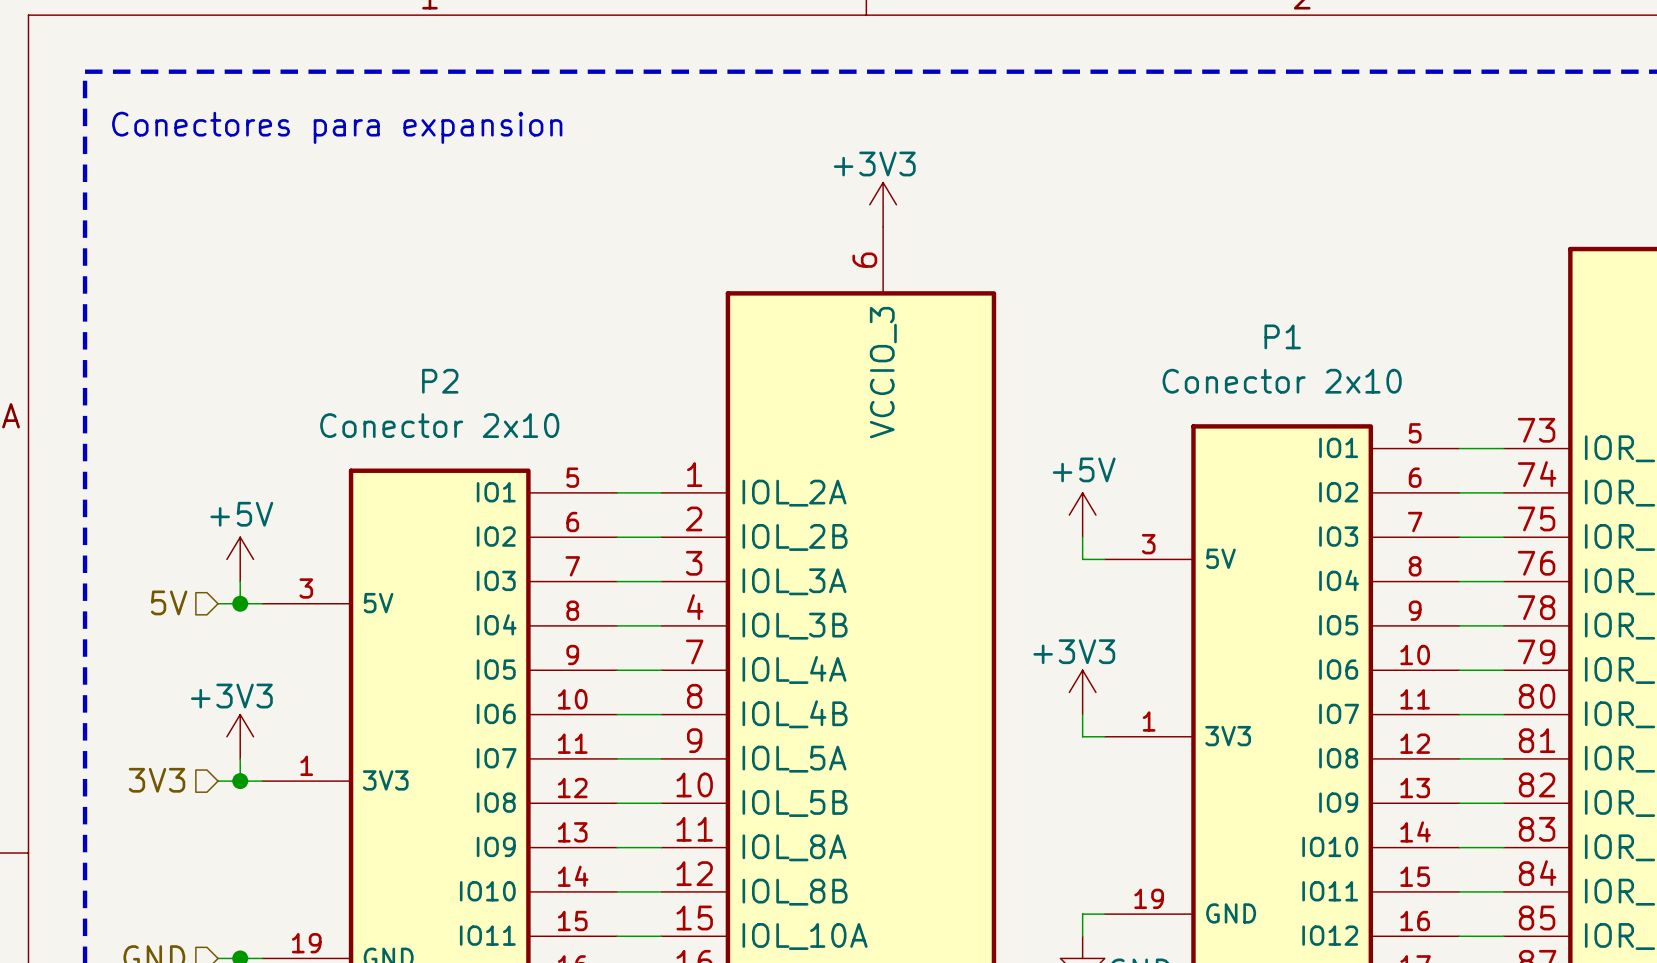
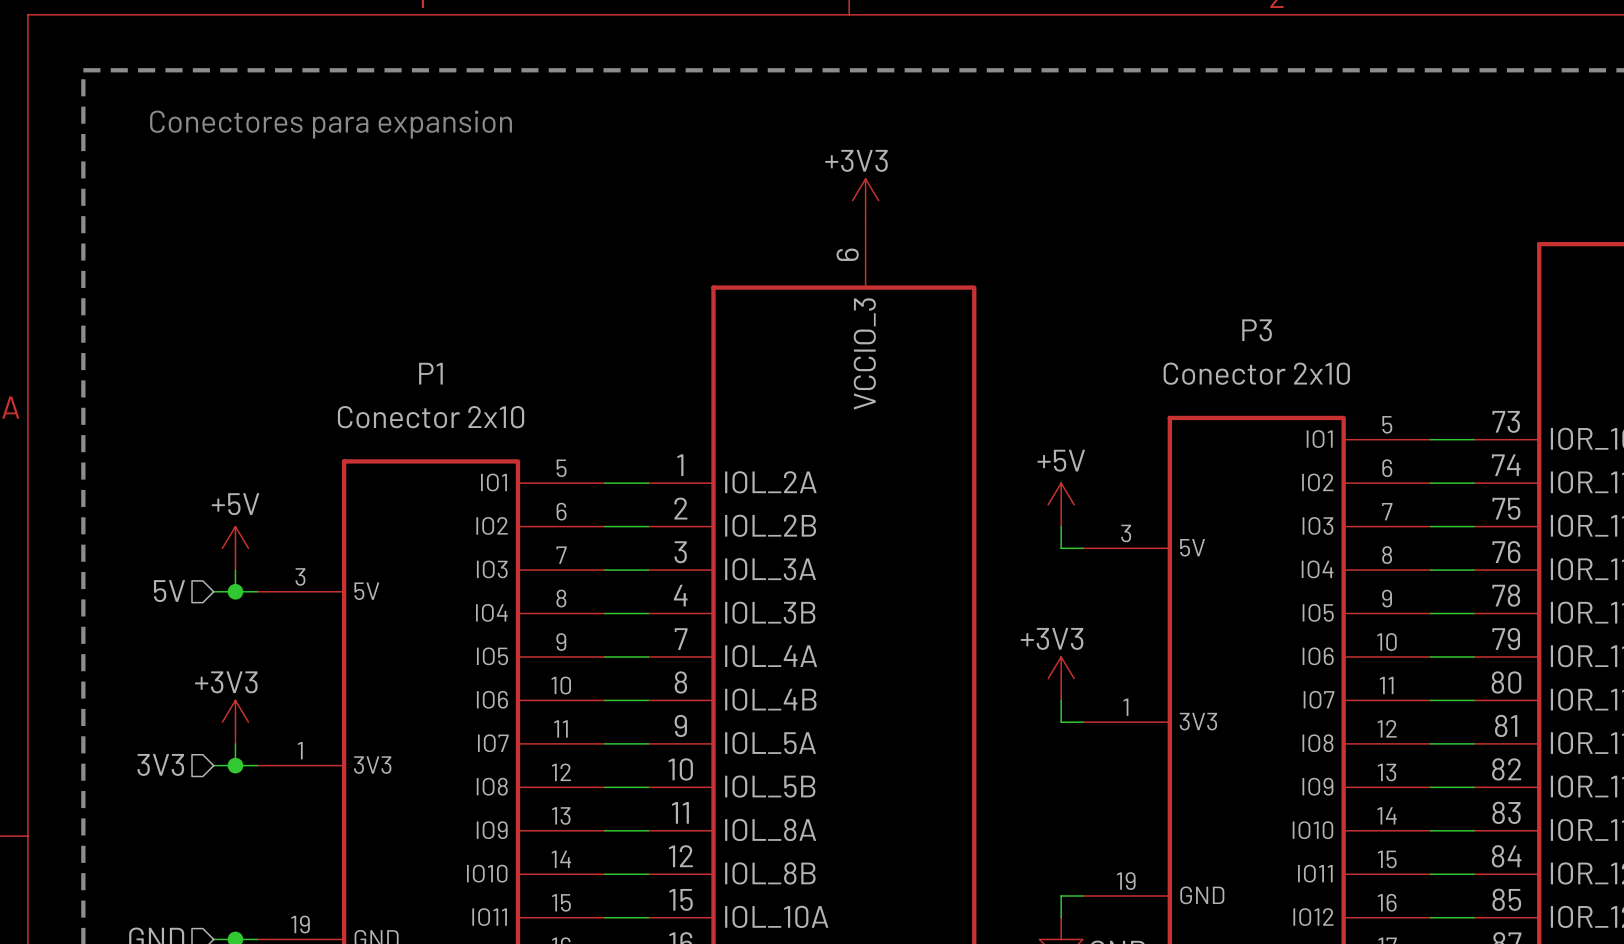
P1 name: P1 (1282, 336) -> P3 (1257, 330)
P2 name: P2 (440, 381) -> P1 (430, 373)

